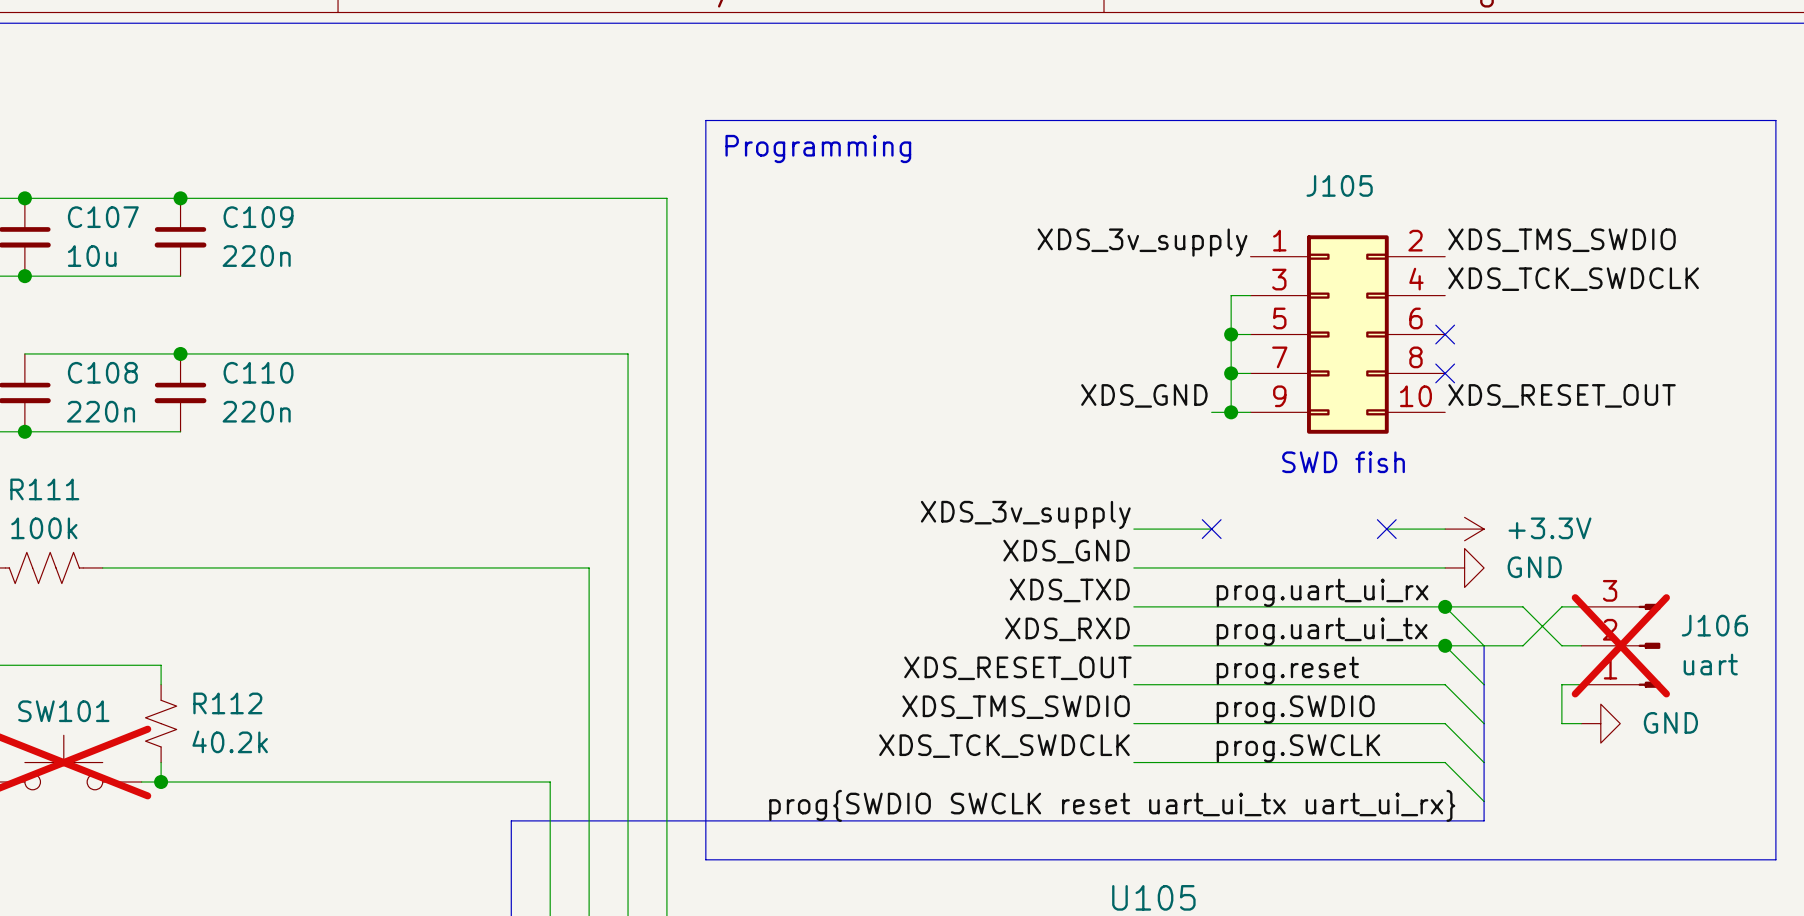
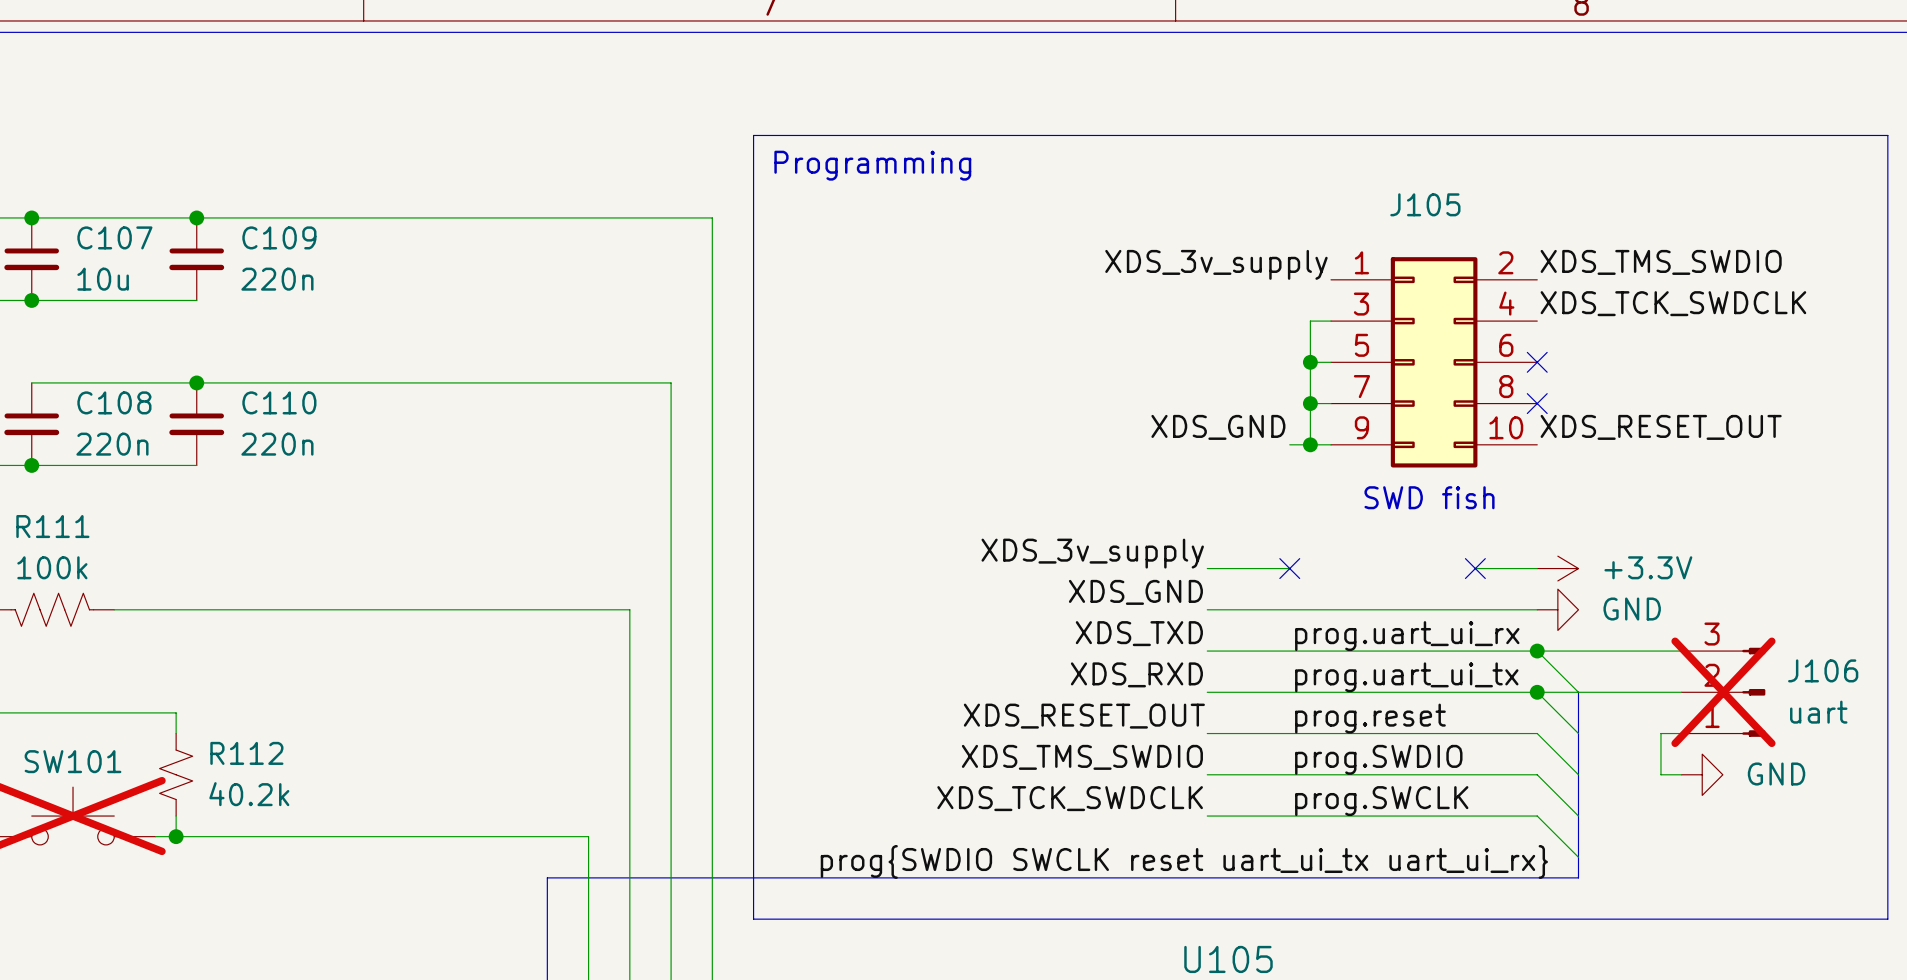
wire: (1522, 606) (1561, 645) -> (1619, 651) (1660, 651)
wire: (1561, 606) (1522, 645) -> (1660, 692) (1619, 692)

